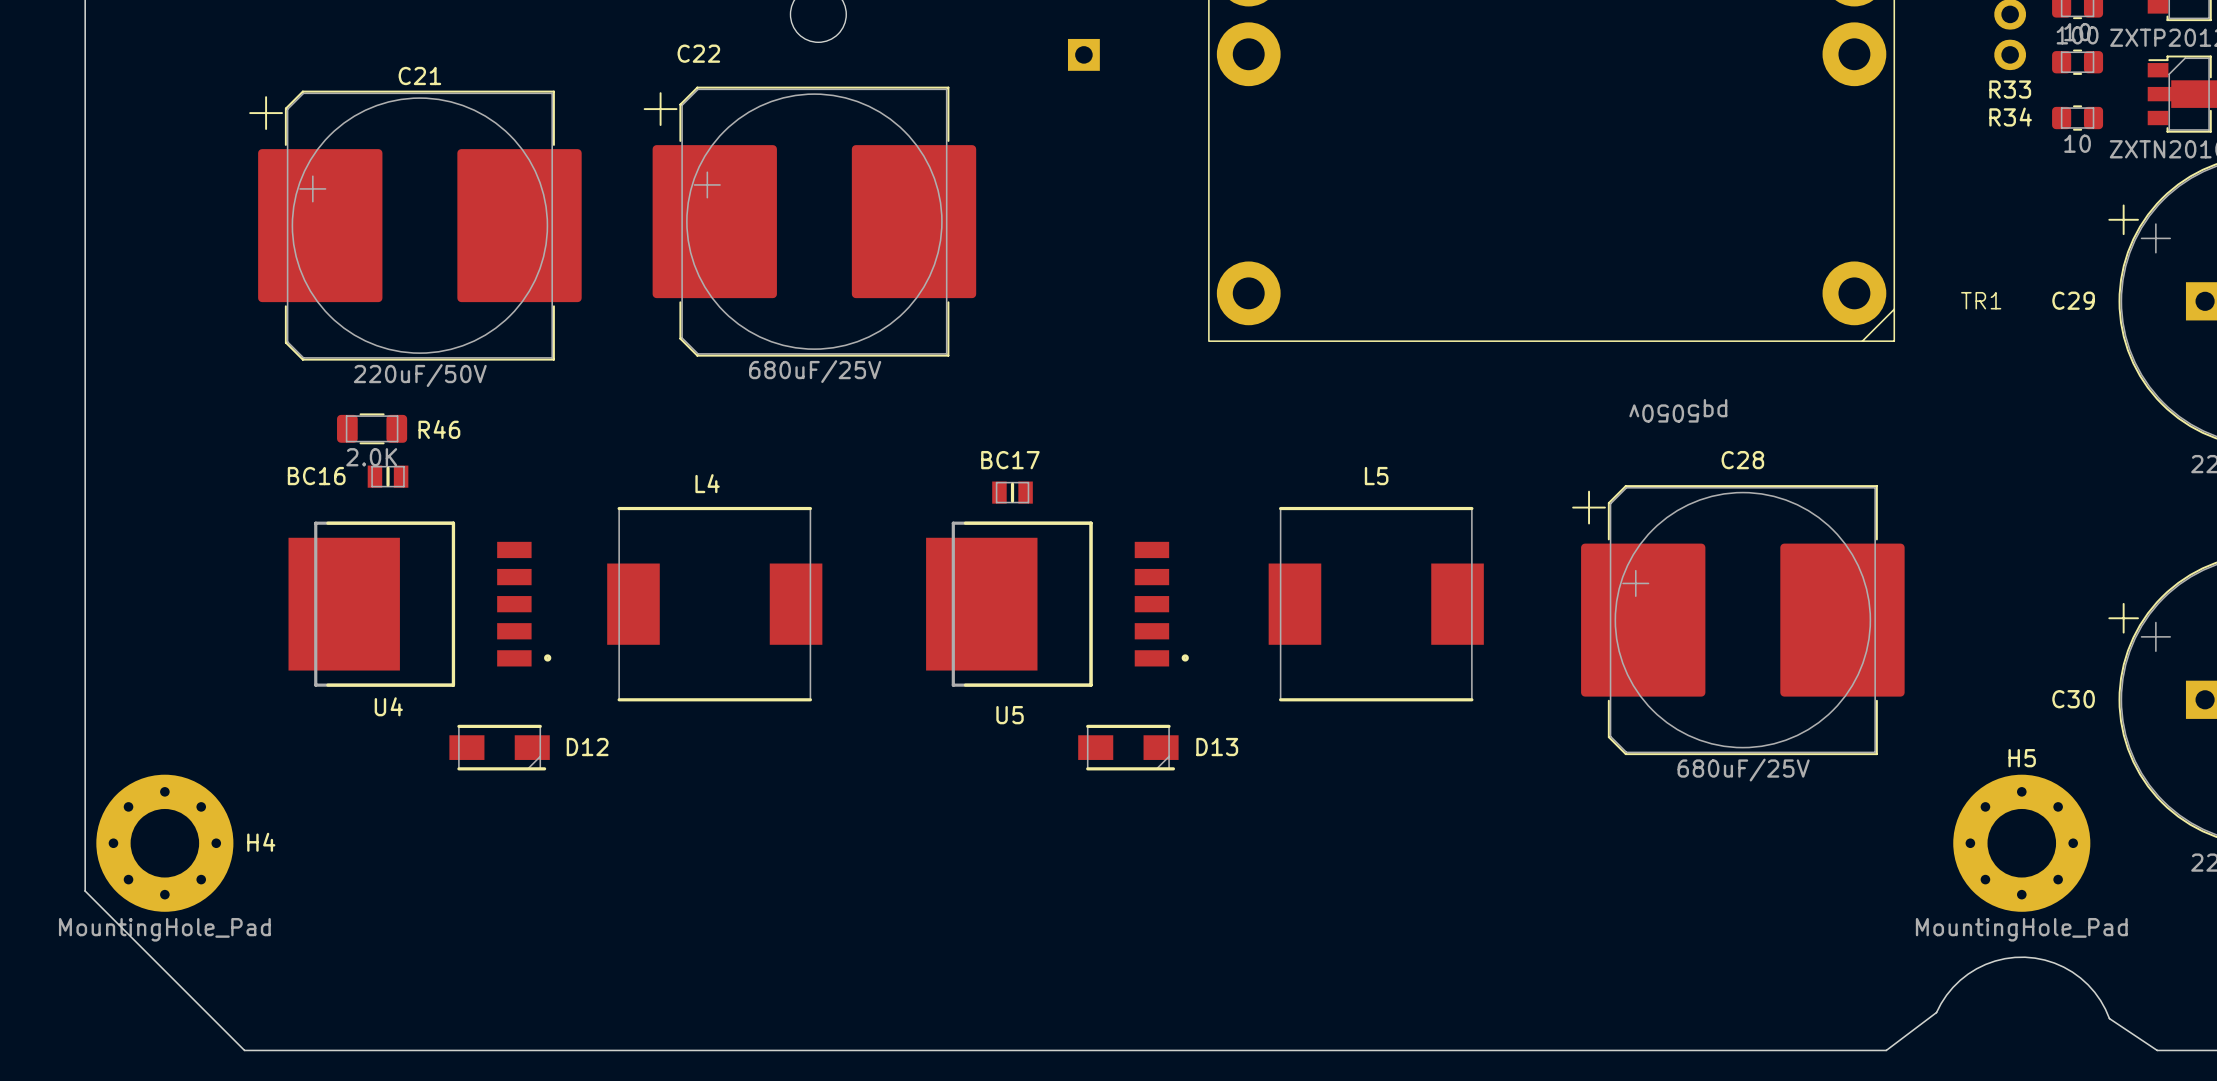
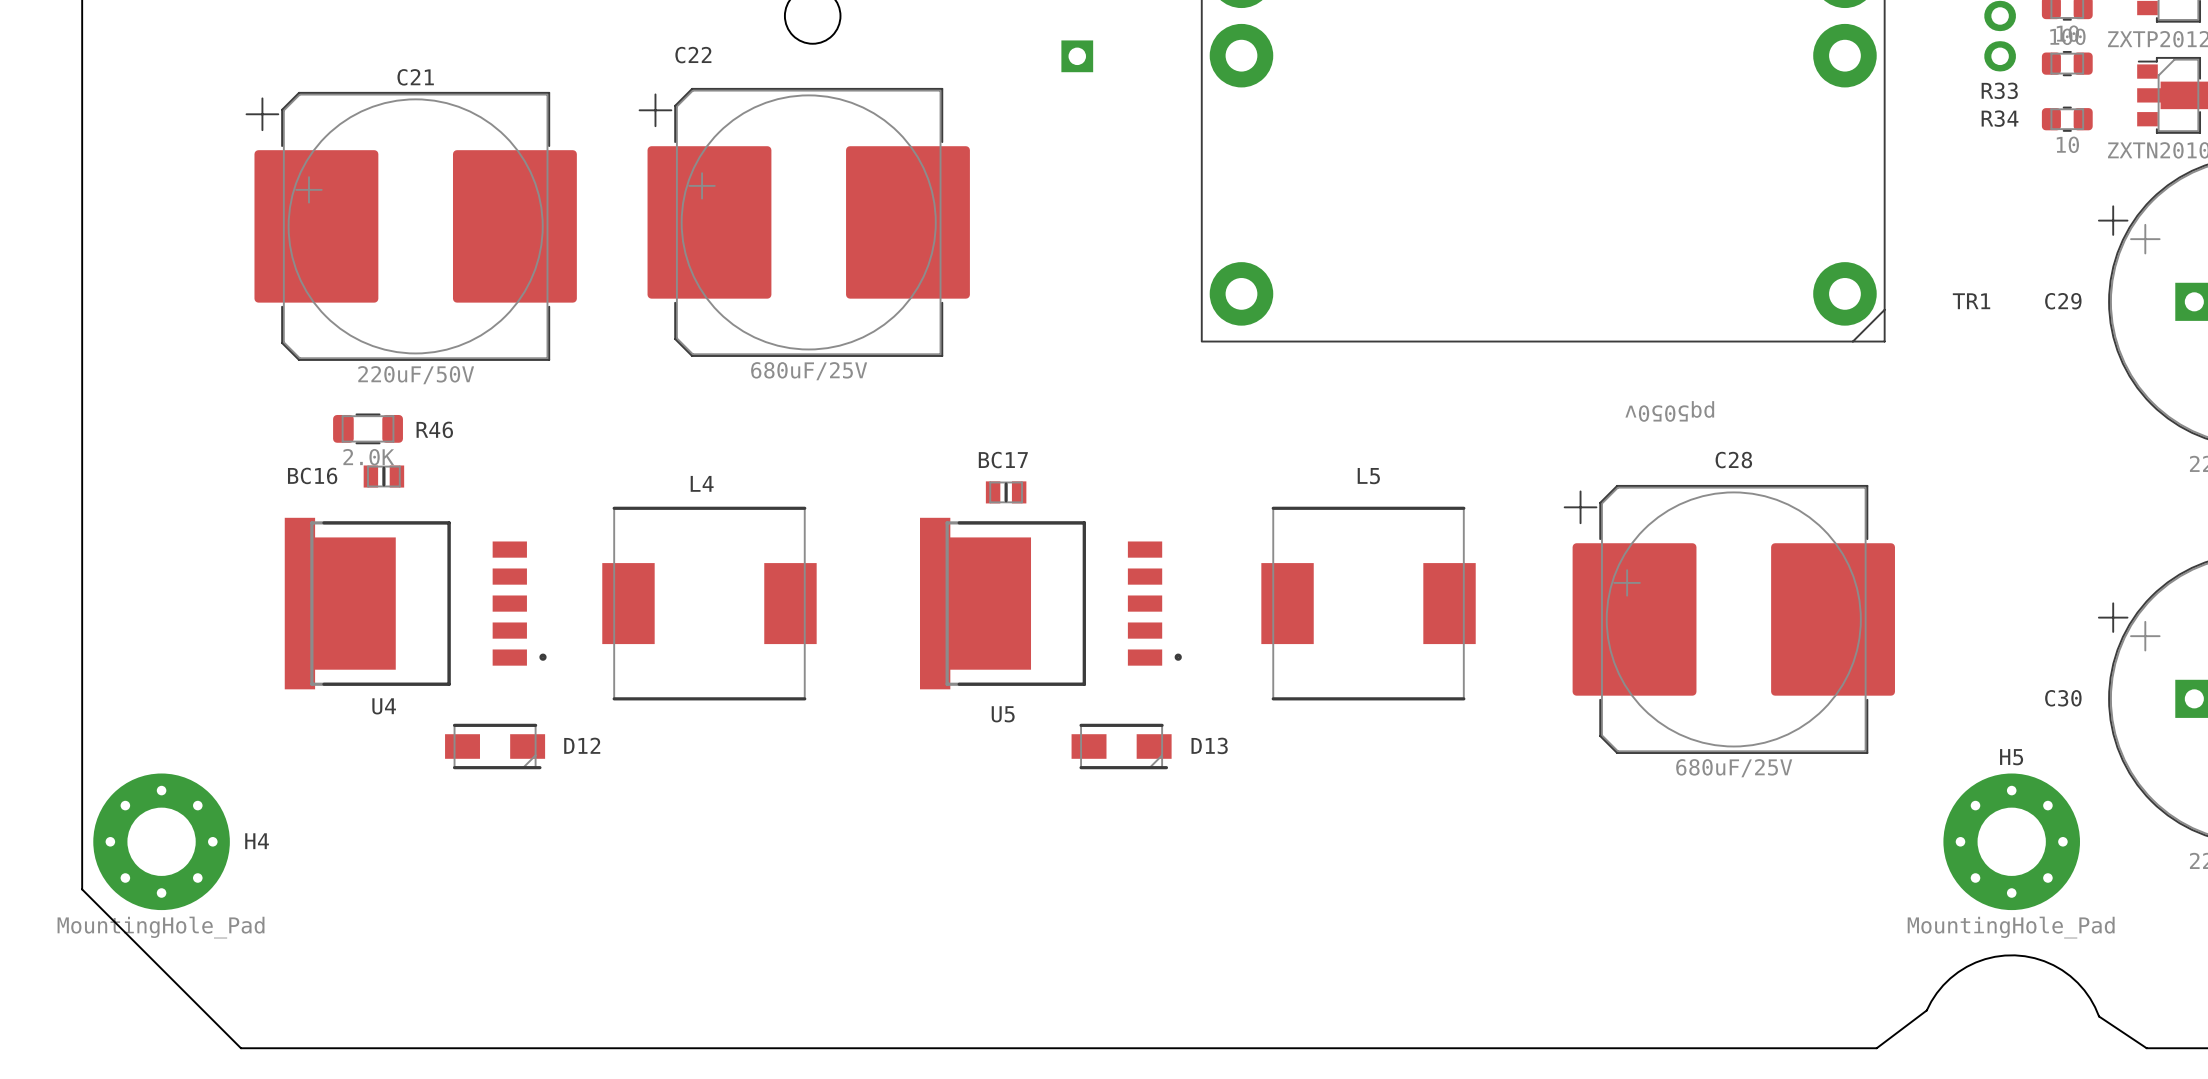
U4 footprint: [288, 521, 552, 687] -> [284, 517, 547, 690]
U5 footprint: [926, 521, 1189, 687] -> [920, 517, 1182, 690]

